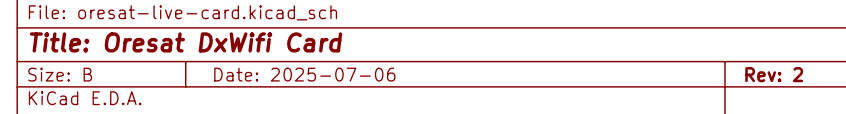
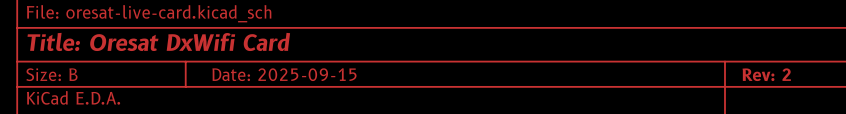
title block: Date: 2025-07-06 (304, 74) -> Date: 2025-09-15 (284, 74)

